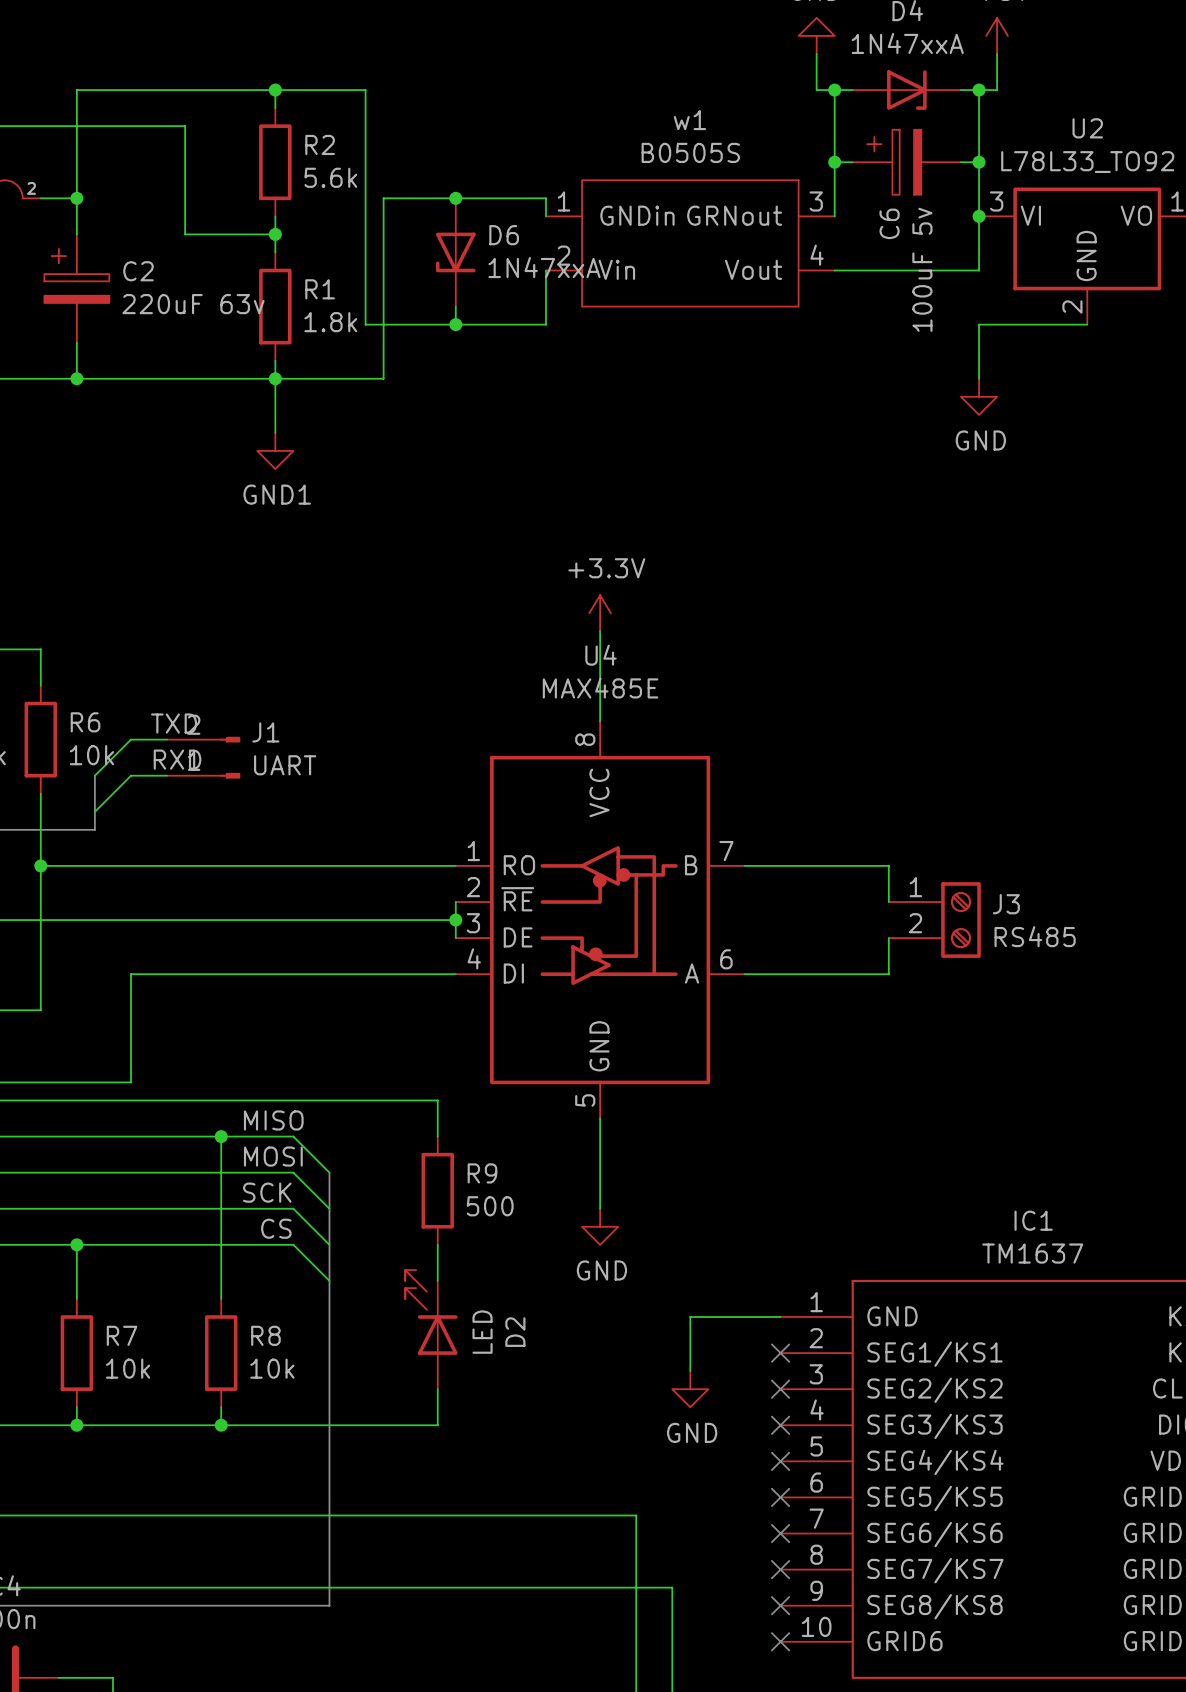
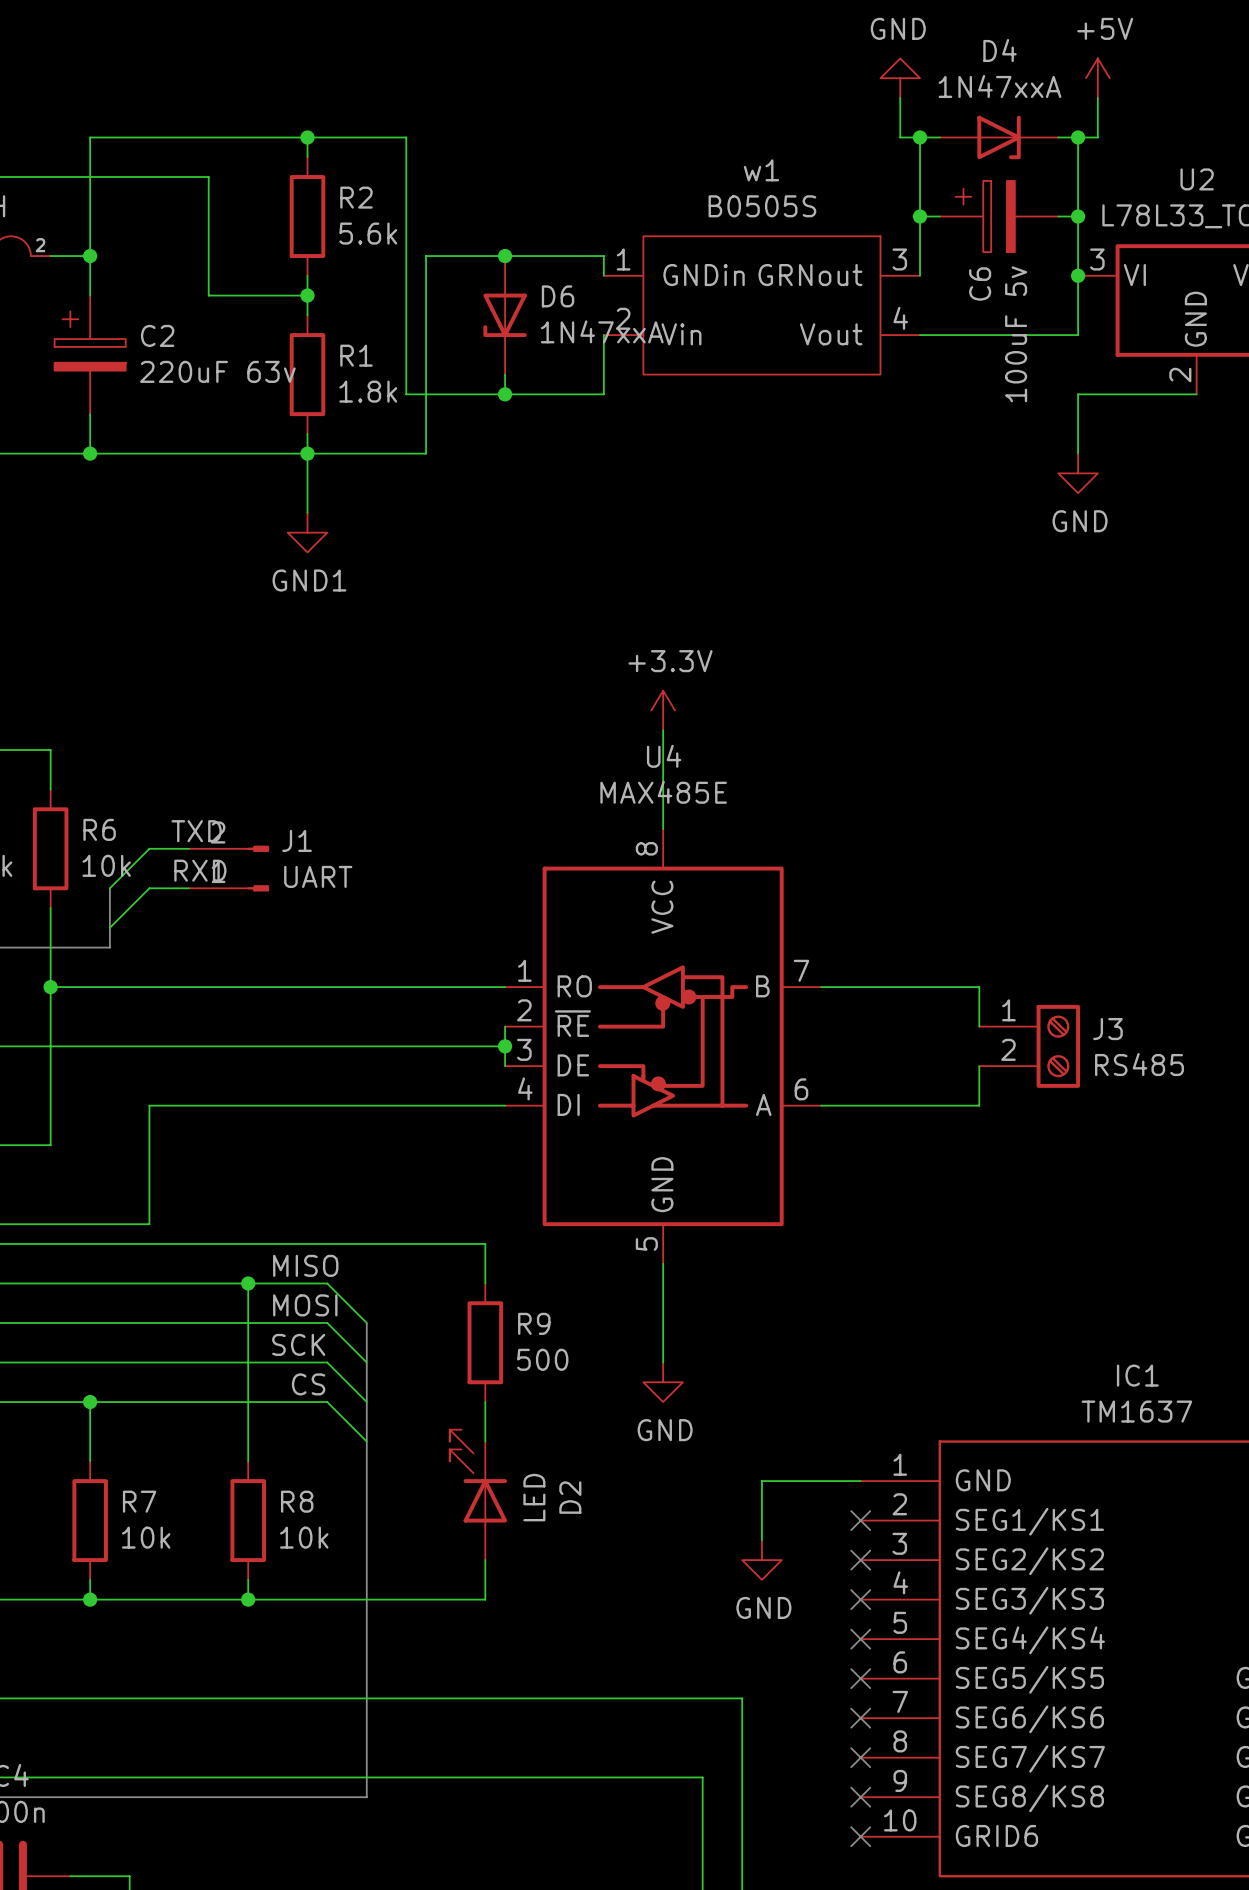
wire: (636, 1515) (636, 1587) (672, 1587) -> (702, 1698) (742, 1698) (742, 1777)

